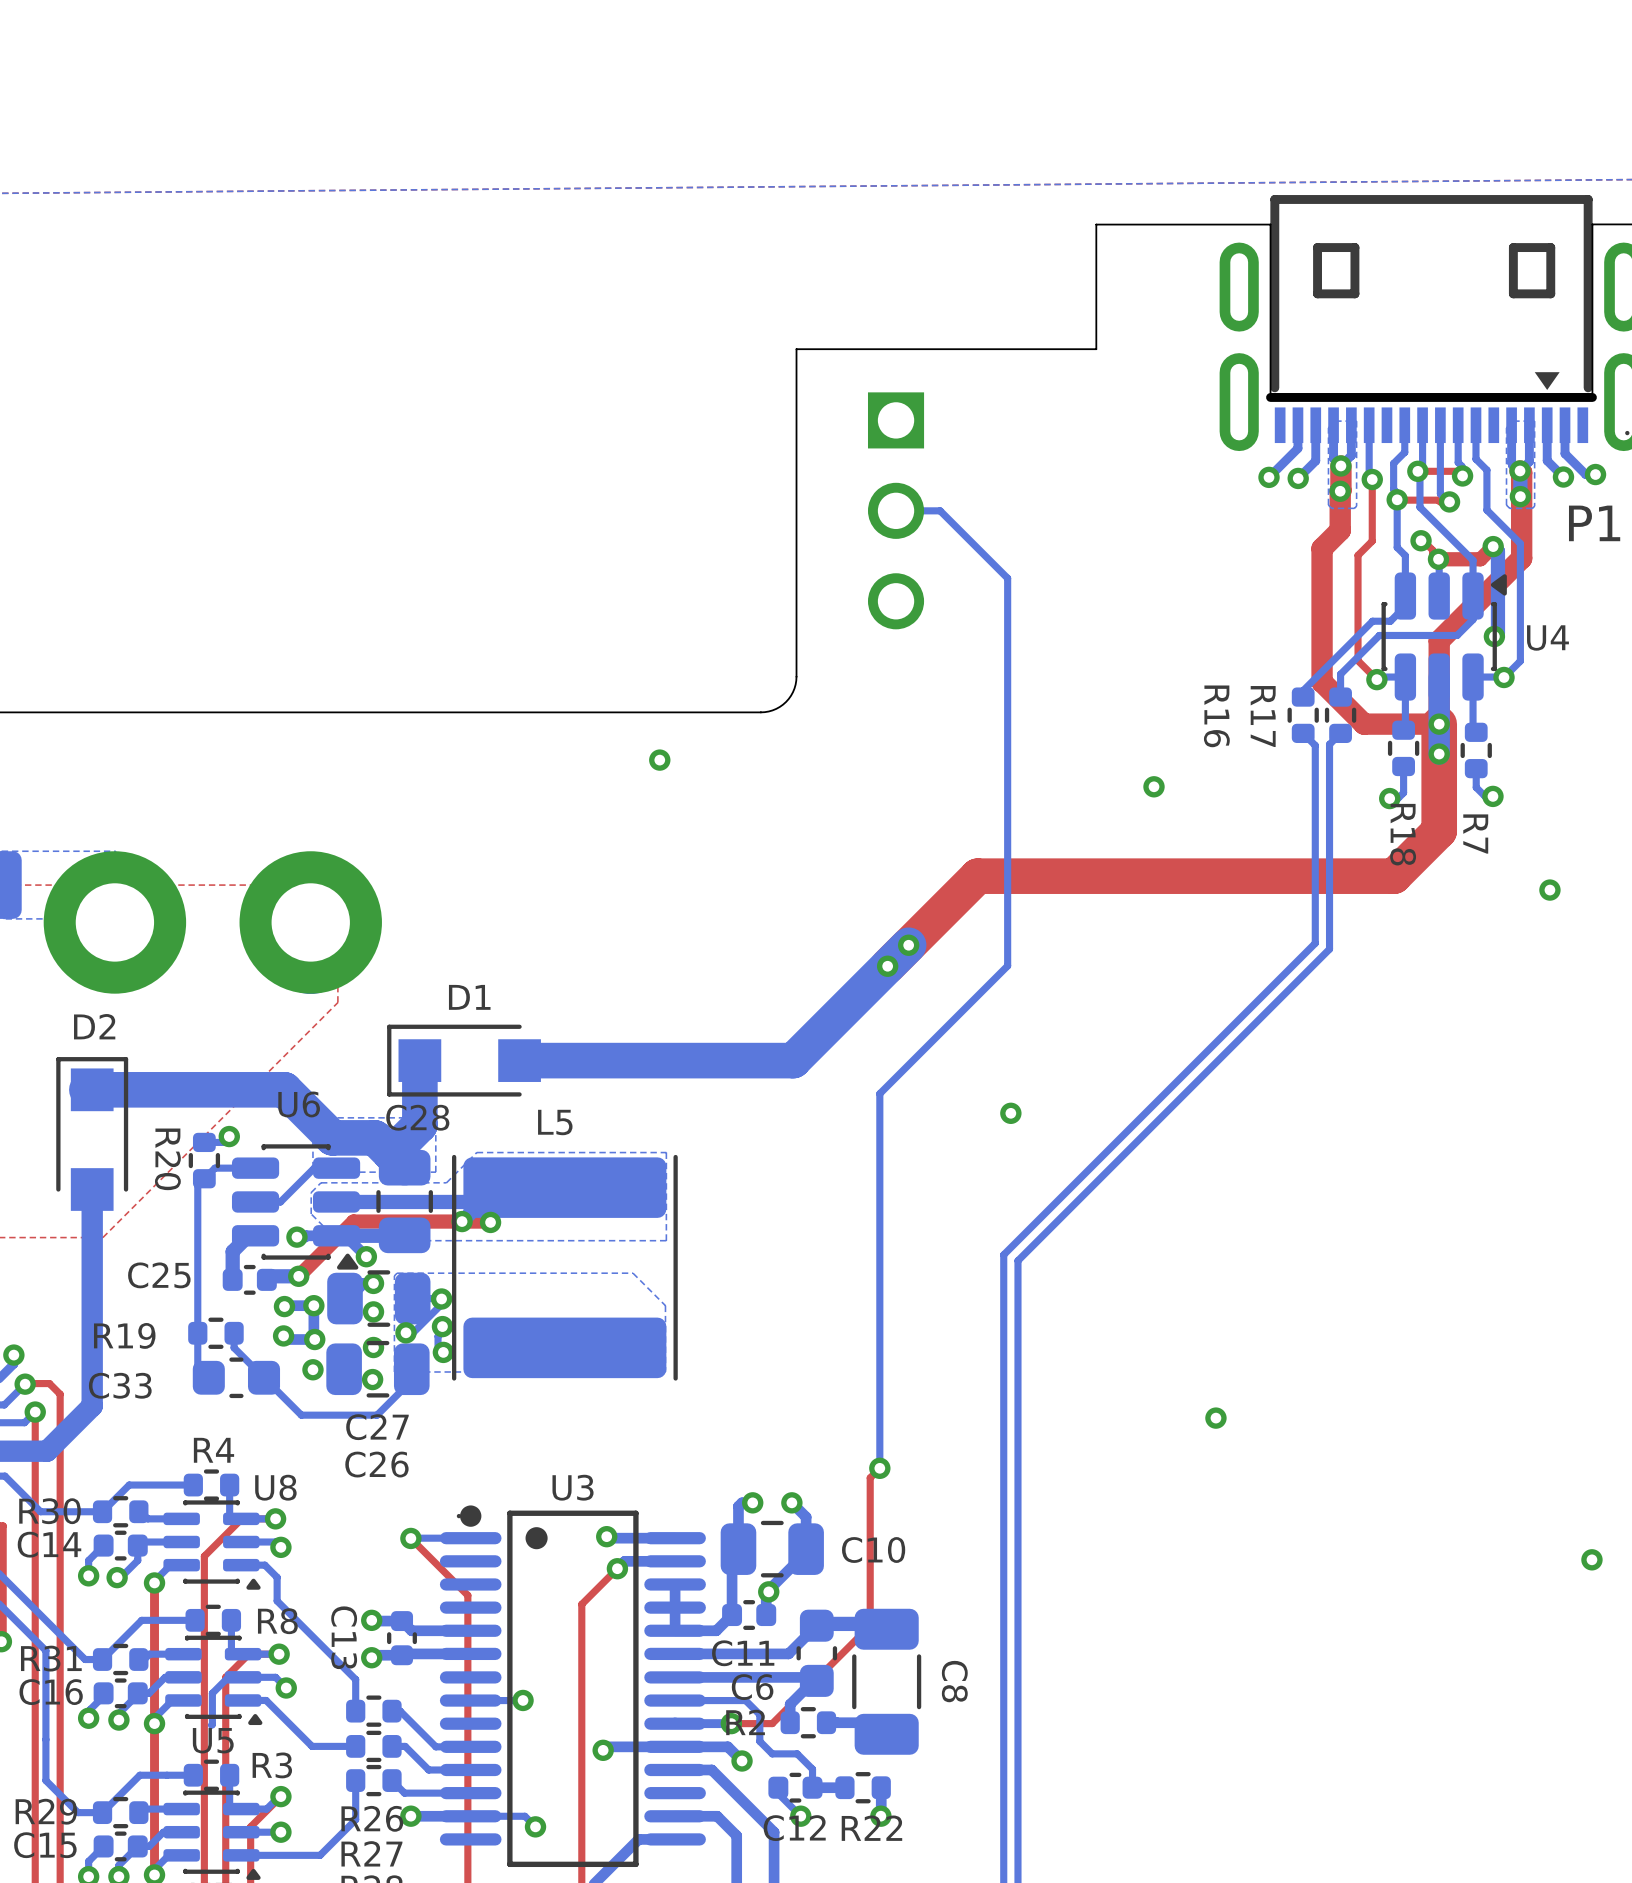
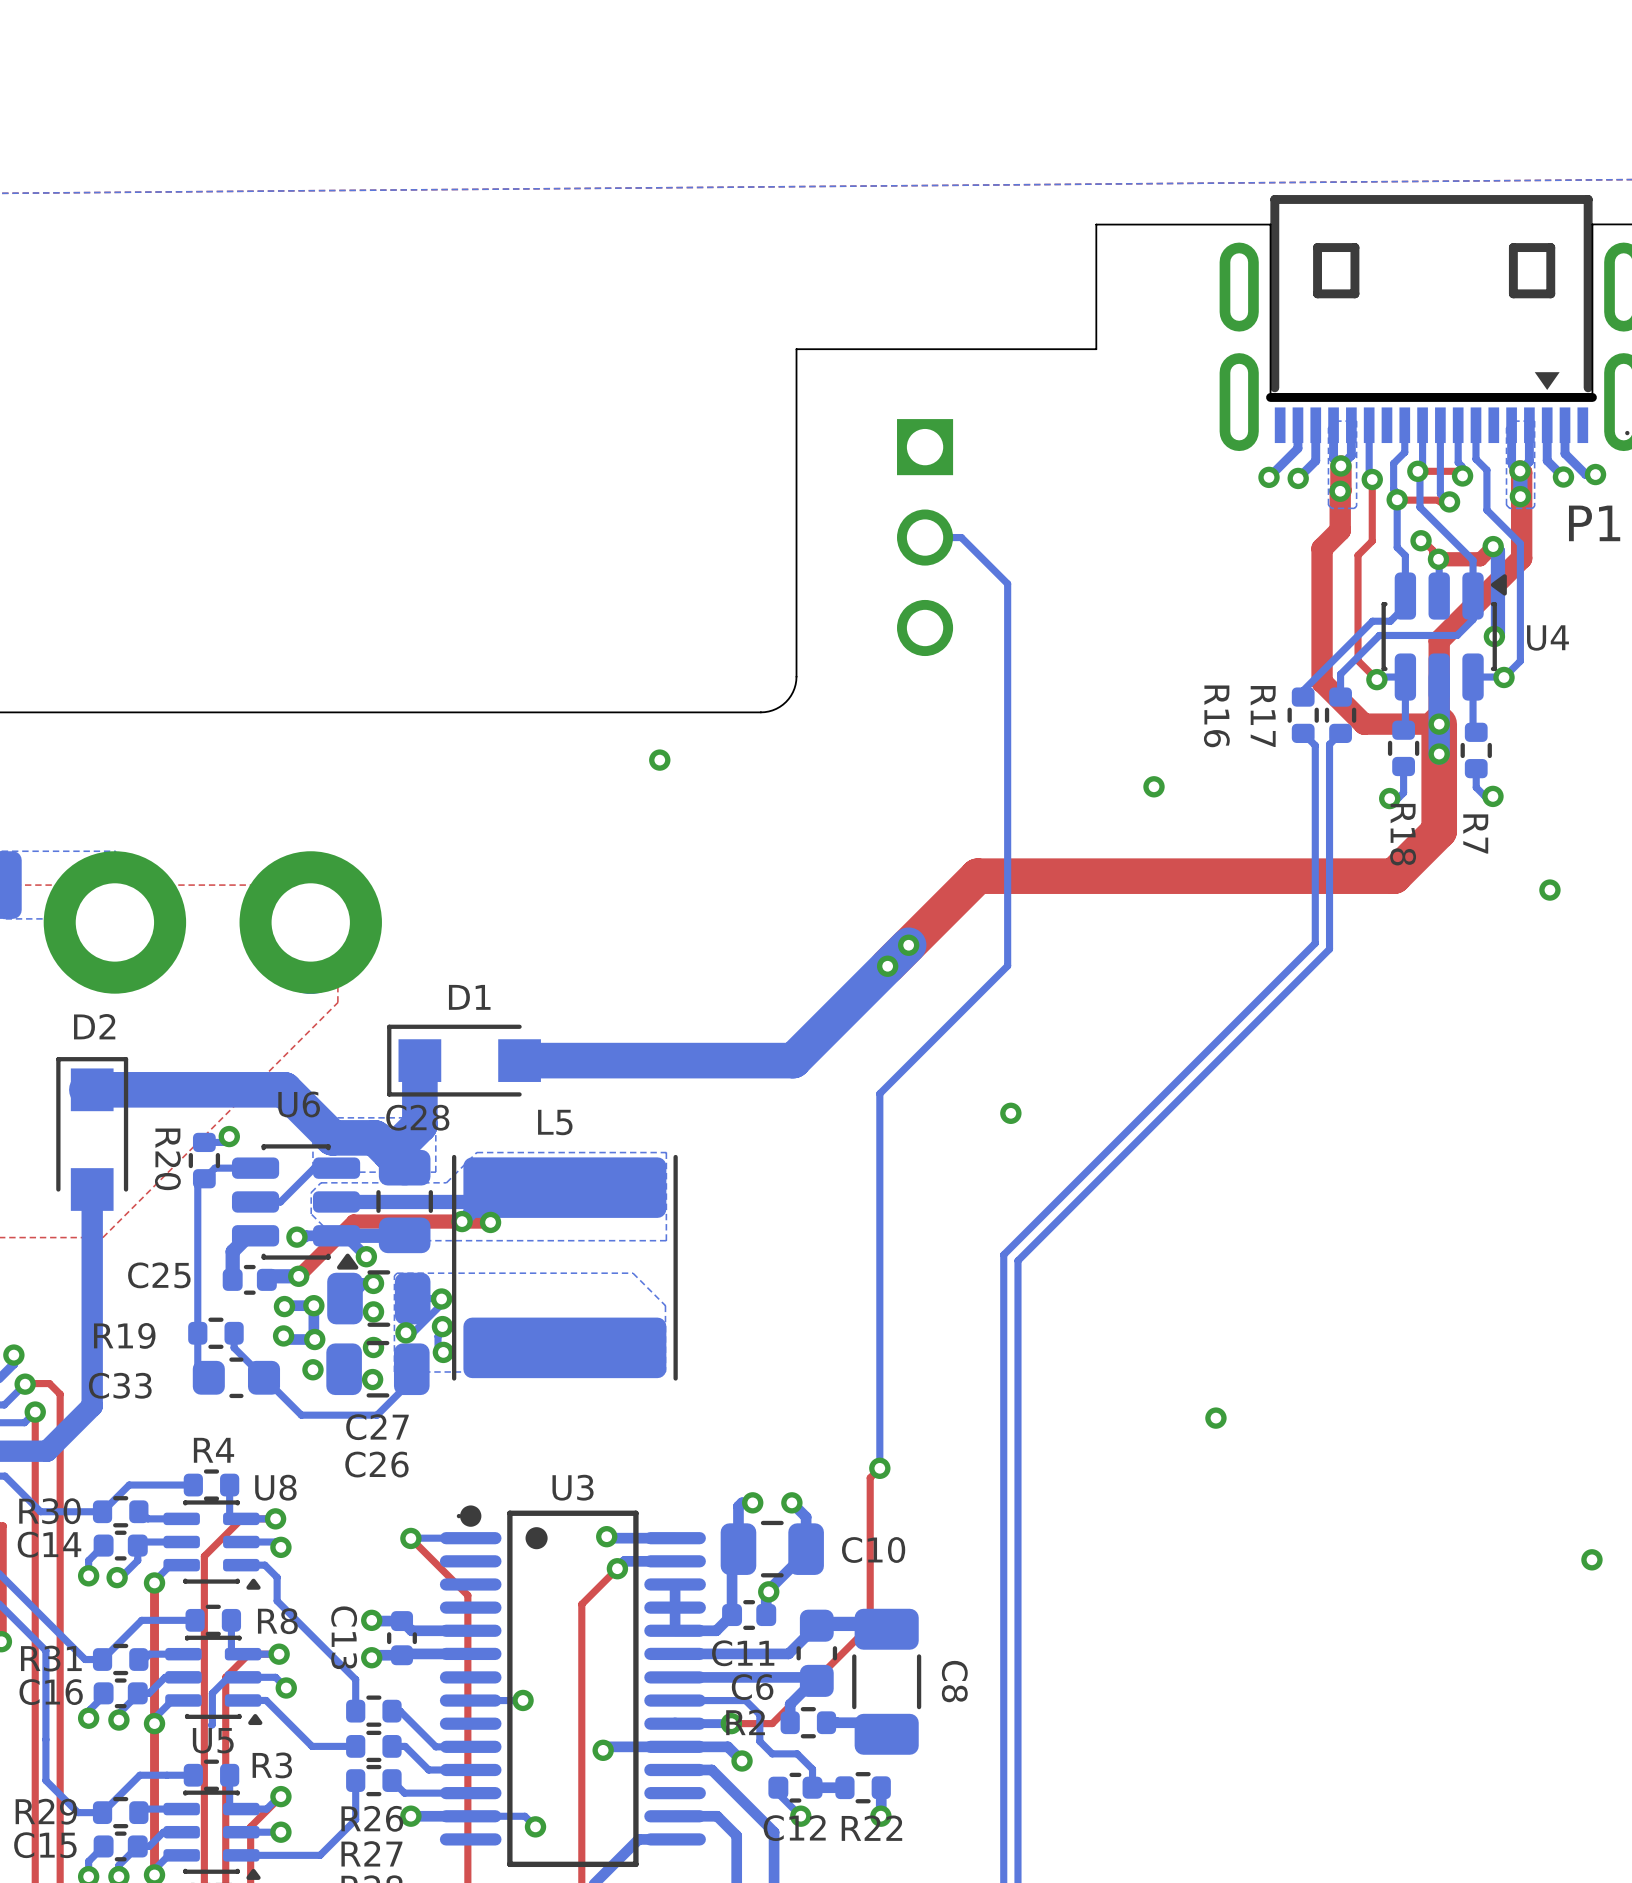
bottom track: (896, 510) (940, 510) (1007, 578) (1007, 583) -> (925, 537) (961, 537) (1007, 583)
part position: (896, 510) -> (925, 537)

